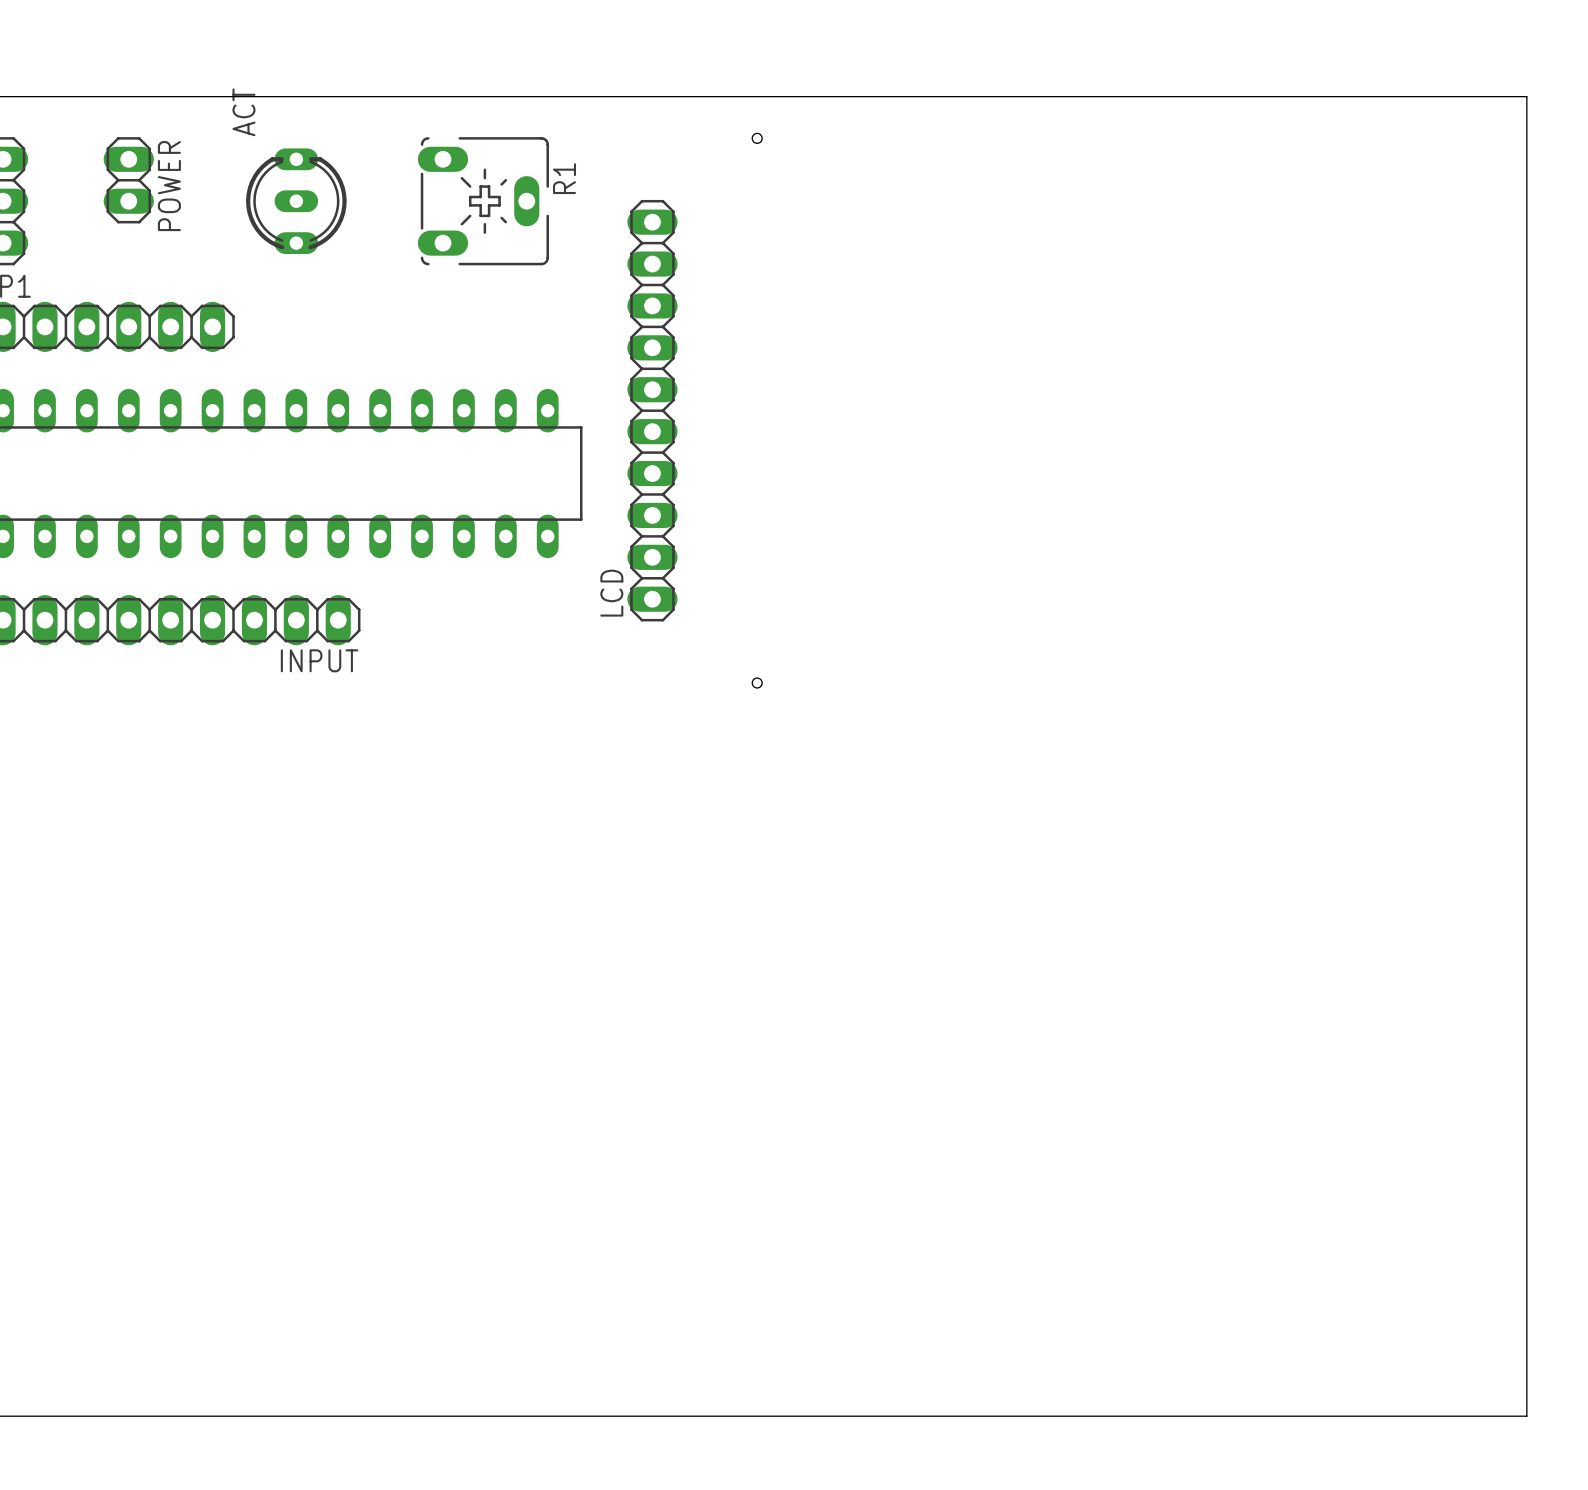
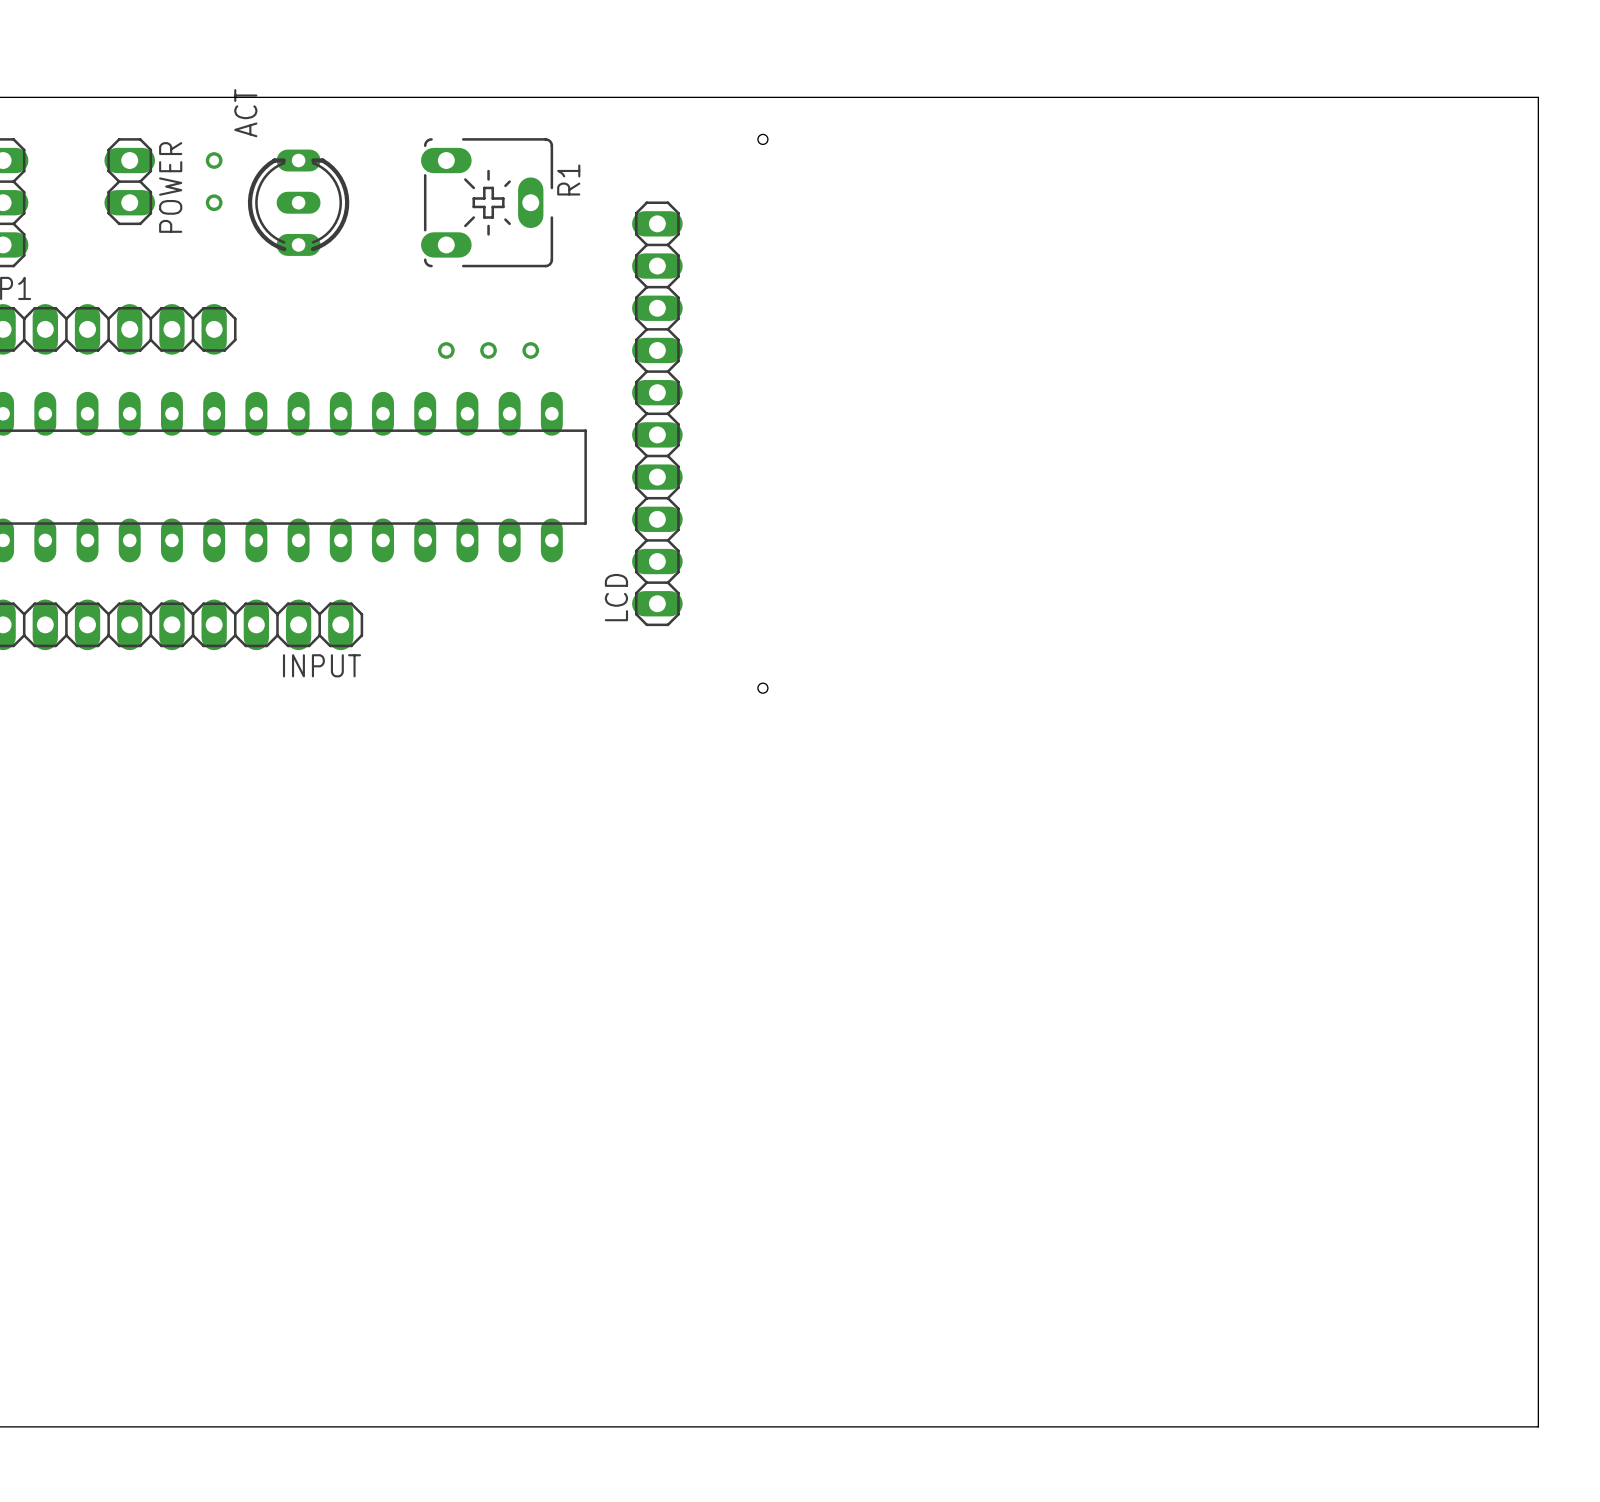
via: none -> (214, 160)
via: none -> (214, 202)
via: none -> (446, 350)
via: none -> (488, 350)
via: none -> (530, 350)

